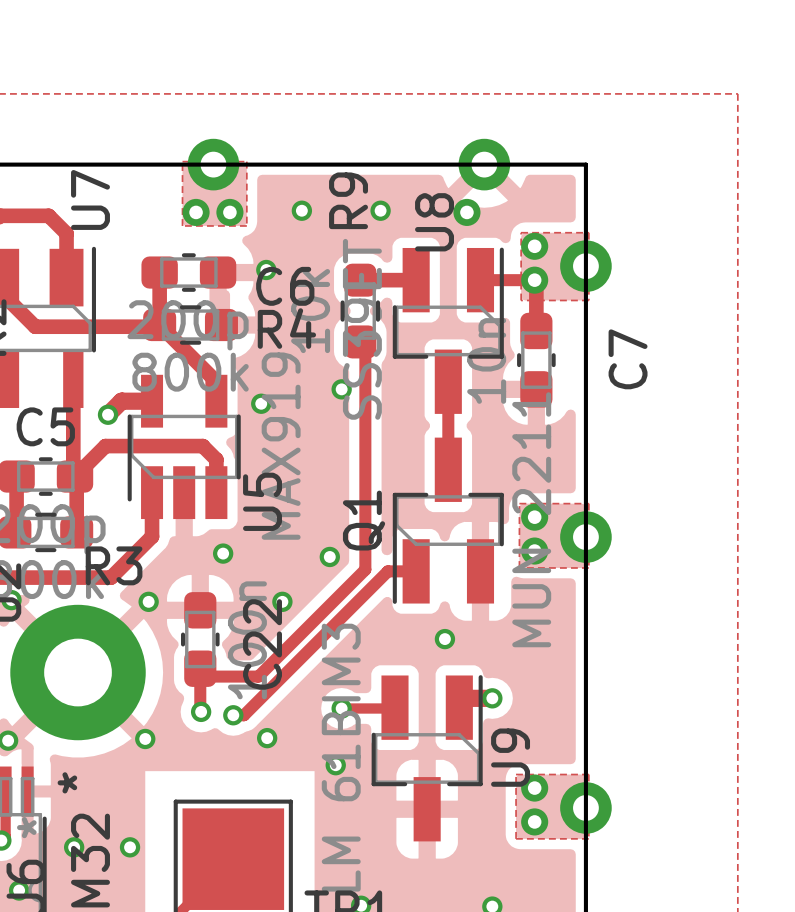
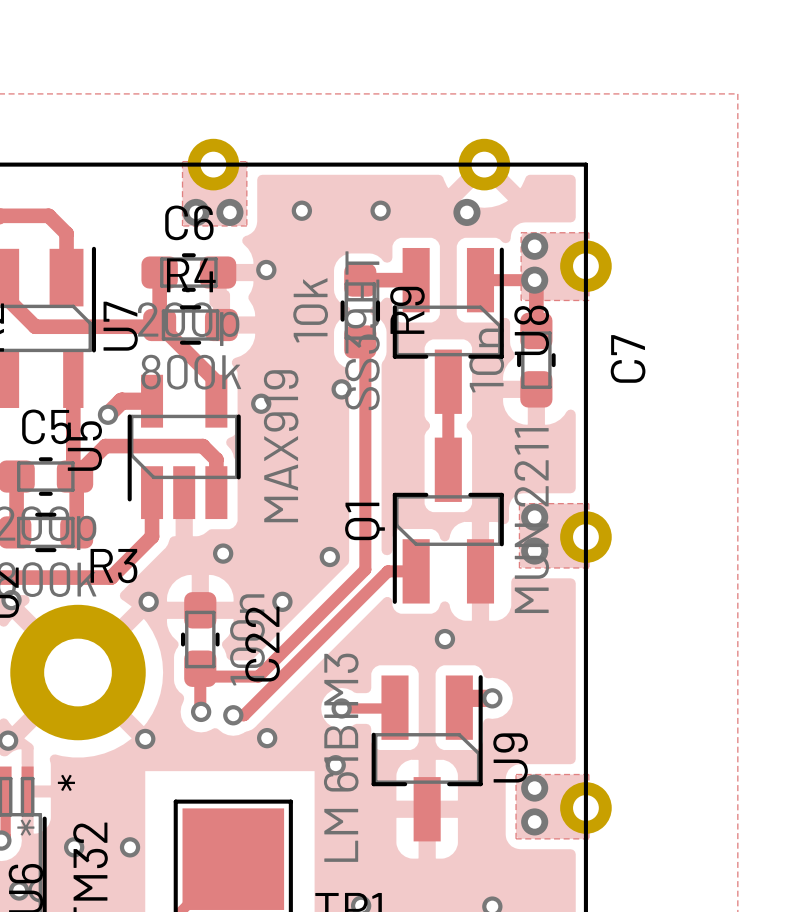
U7 name position: U7 (90, 199) -> U7 (120, 326)
R9 name position: R9 (348, 200) -> R9 (407, 310)
U8 name position: U8 (434, 222) -> U8 (531, 330)
C6 name position: C6 (285, 286) -> C6 (189, 222)
R4 name position: R4 (286, 328) -> R4 (191, 275)
U5 name position: U5 (262, 501) -> U5 (84, 446)

